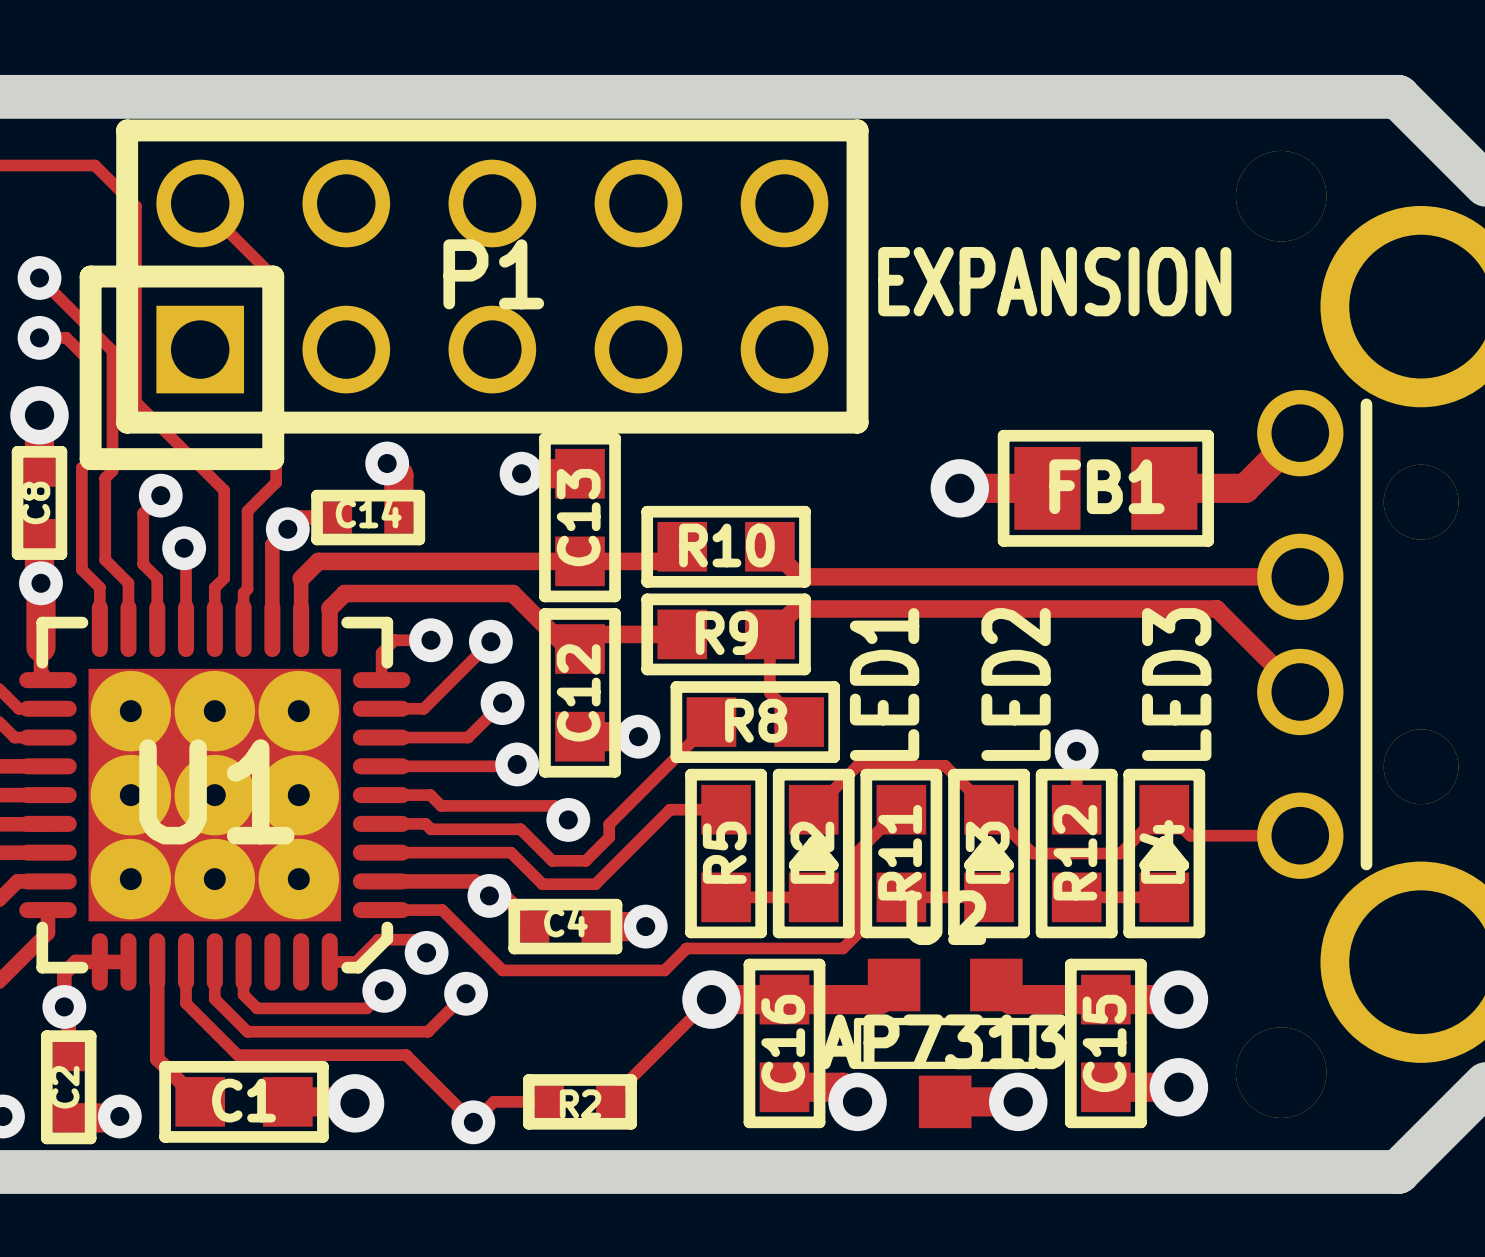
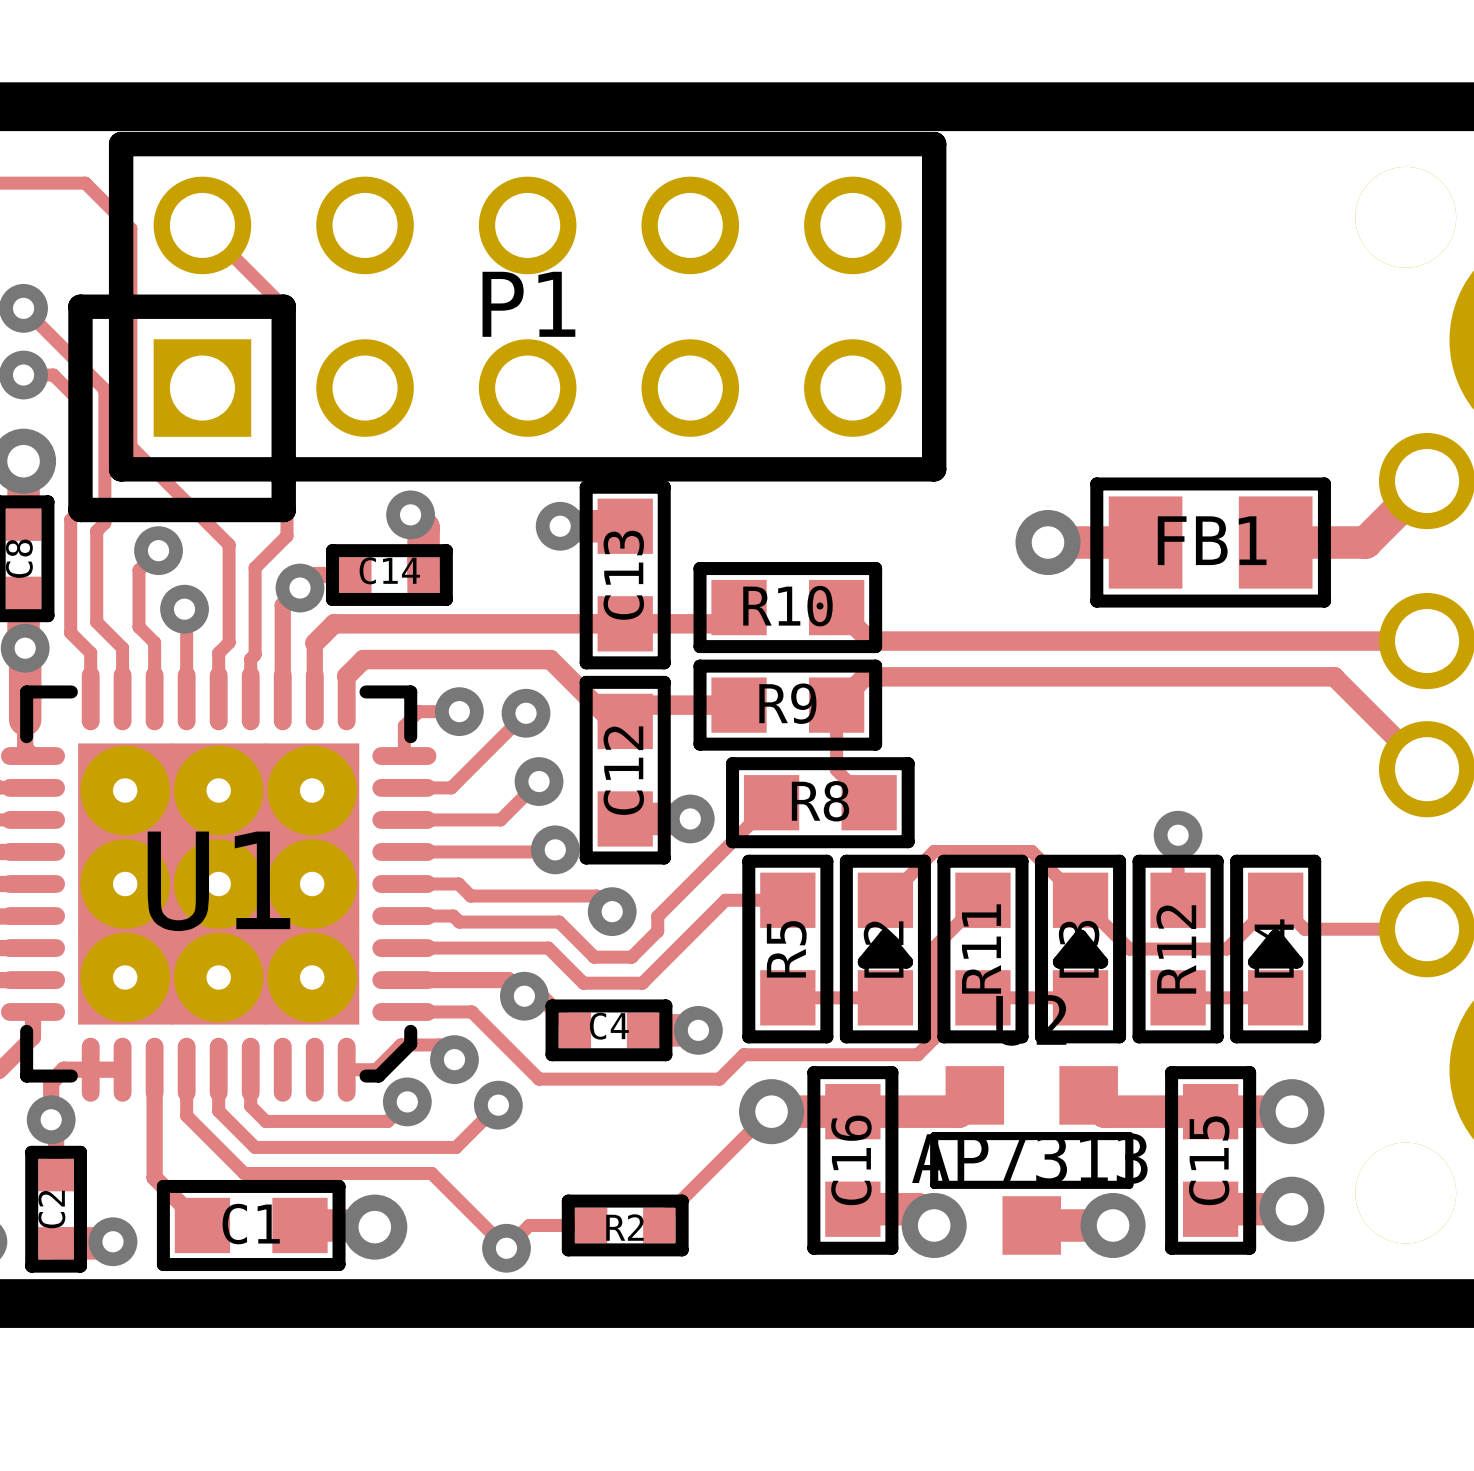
text: EXPANSION (1054, 281) -> none
text: LED1 (884, 684) -> none
text: LED2 (1016, 684) -> none
text: LED3 (1176, 684) -> none

